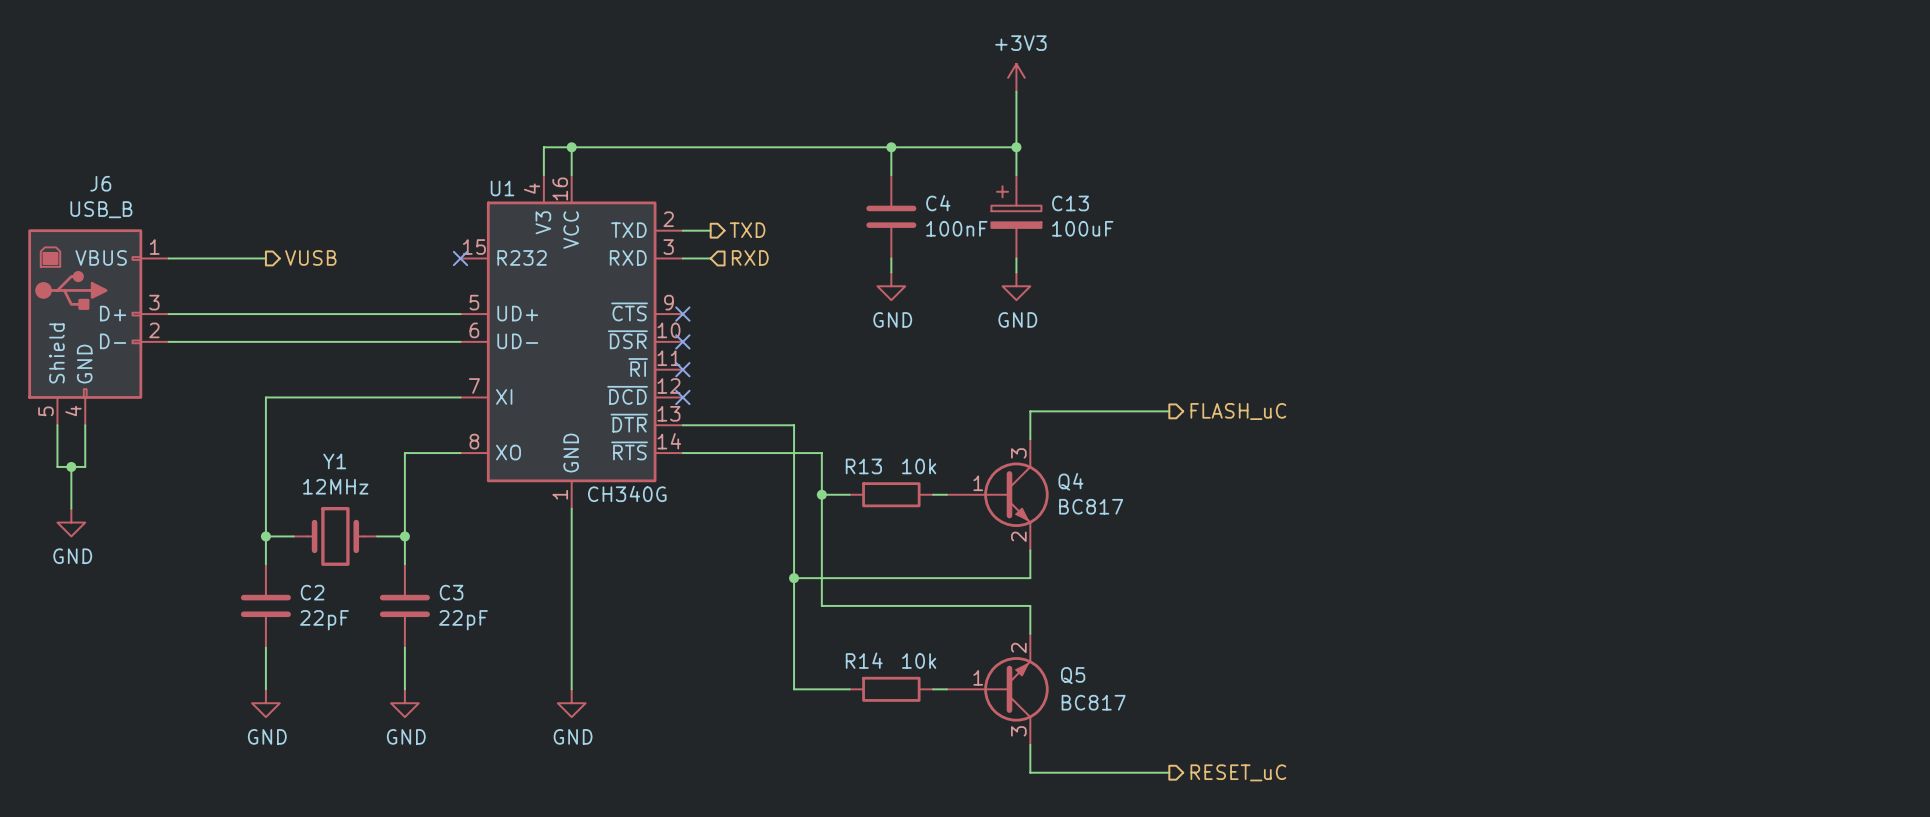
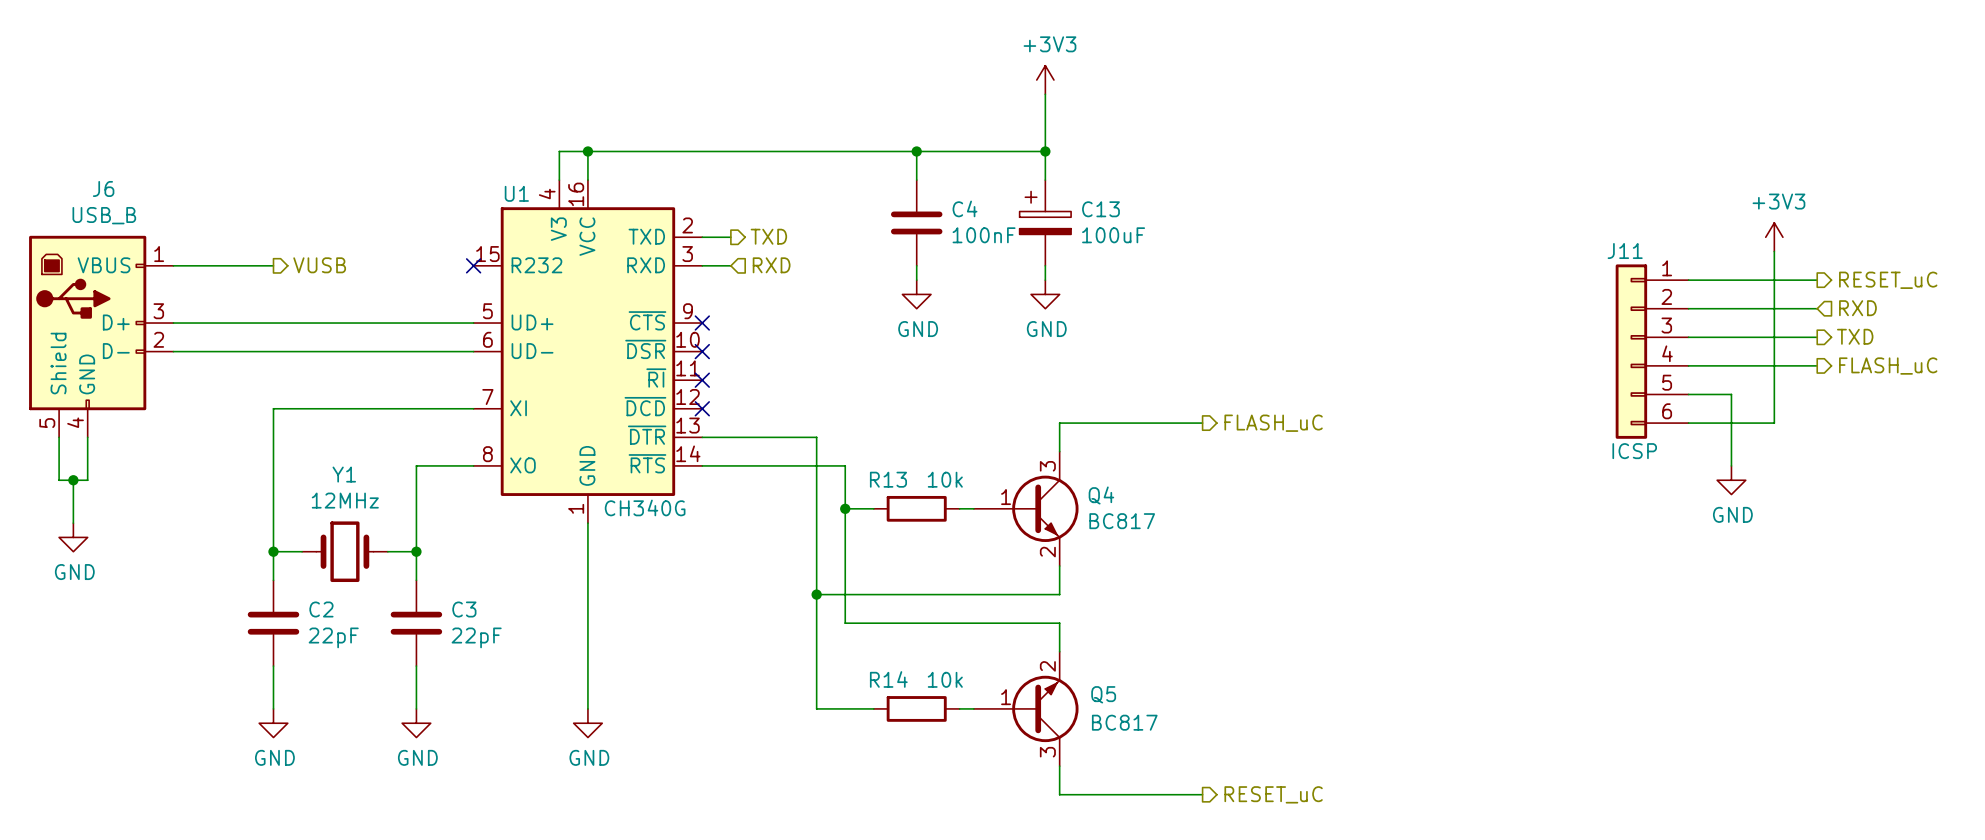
power symbol: none -> +3V3 (1774, 237)
wire: none -> (1774, 251) (1774, 423) (1688, 423)
wire: none -> (1688, 280) (1817, 280)
hierarchical label: none -> RESET_uC (1888, 280)
hierarchical label: none -> RXD (1857, 308)
wire: none -> (1688, 308) (1817, 308)
wire: none -> (1688, 337) (1817, 337)
hierarchical label: none -> TXD (1855, 336)
J11: none -> ICSP (1652, 351)
wire: none -> (1688, 365) (1817, 365)
hierarchical label: none -> FLASH_uC (1888, 366)
wire: none -> (1688, 394) (1731, 394) (1731, 465)
power symbol: none -> GND (1731, 480)

